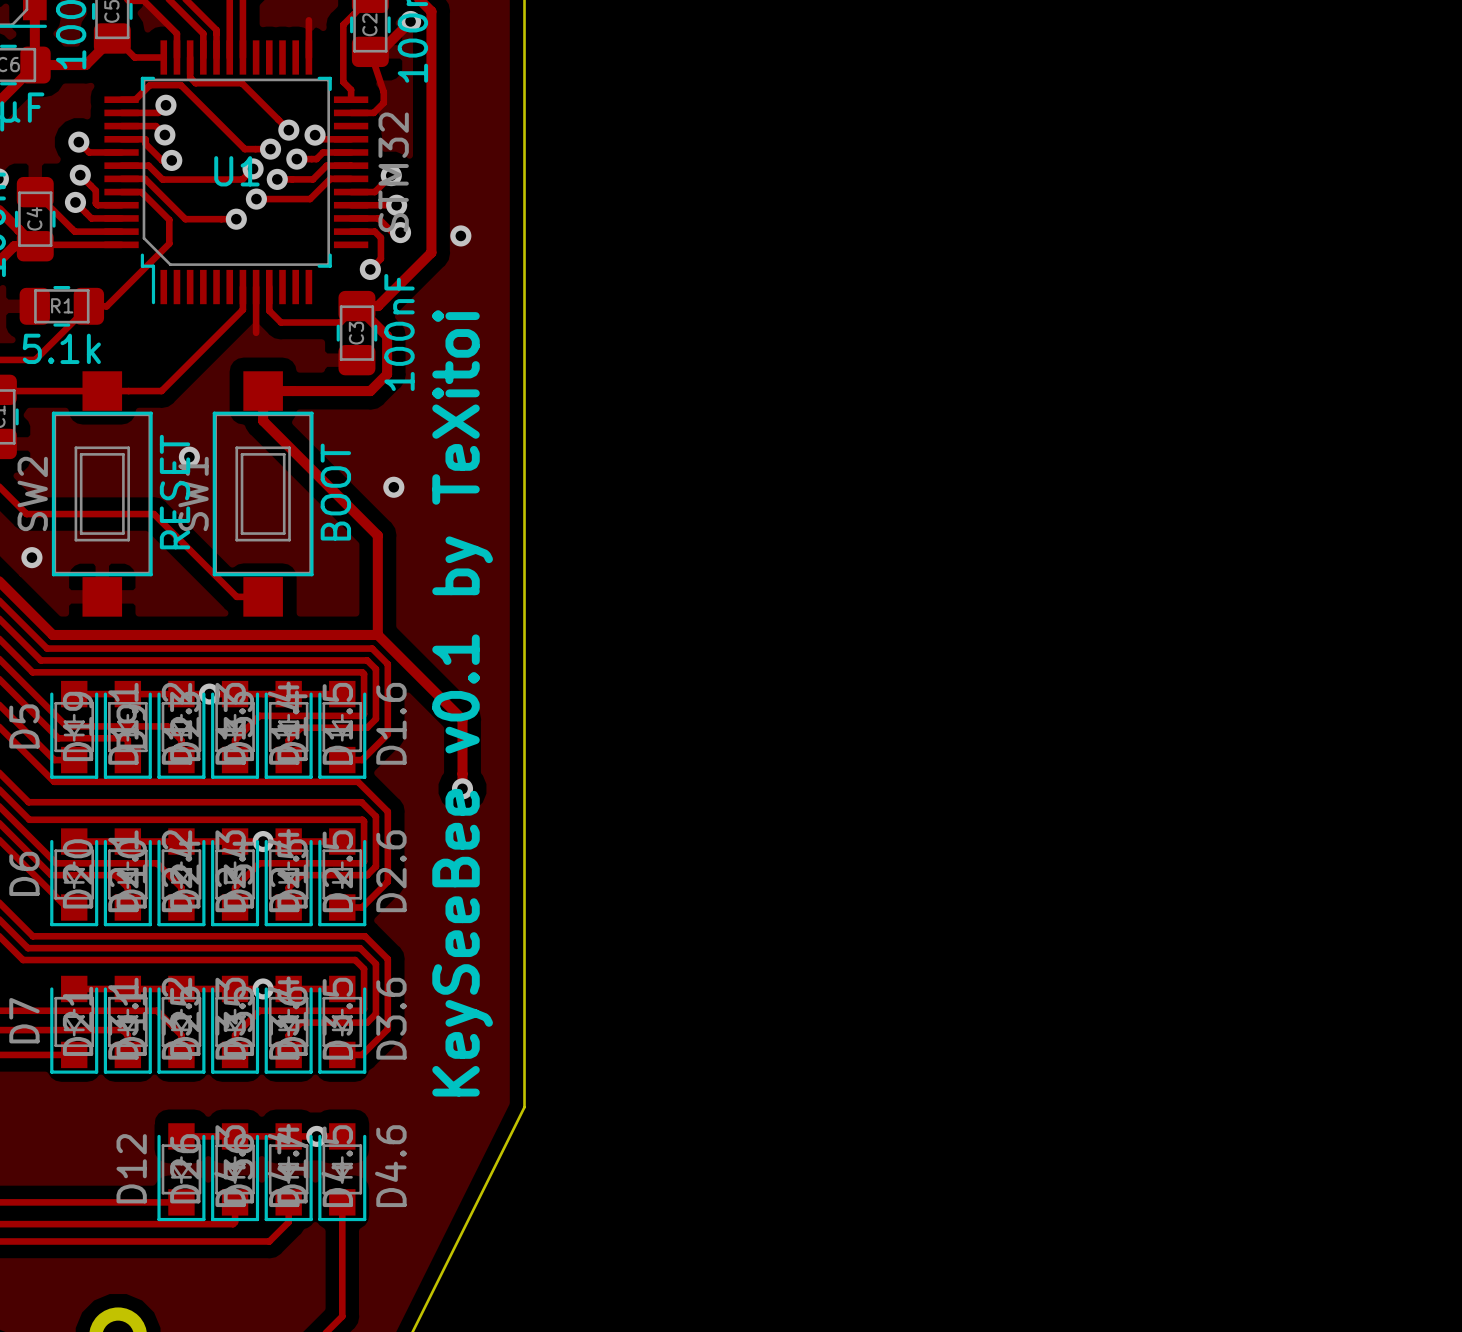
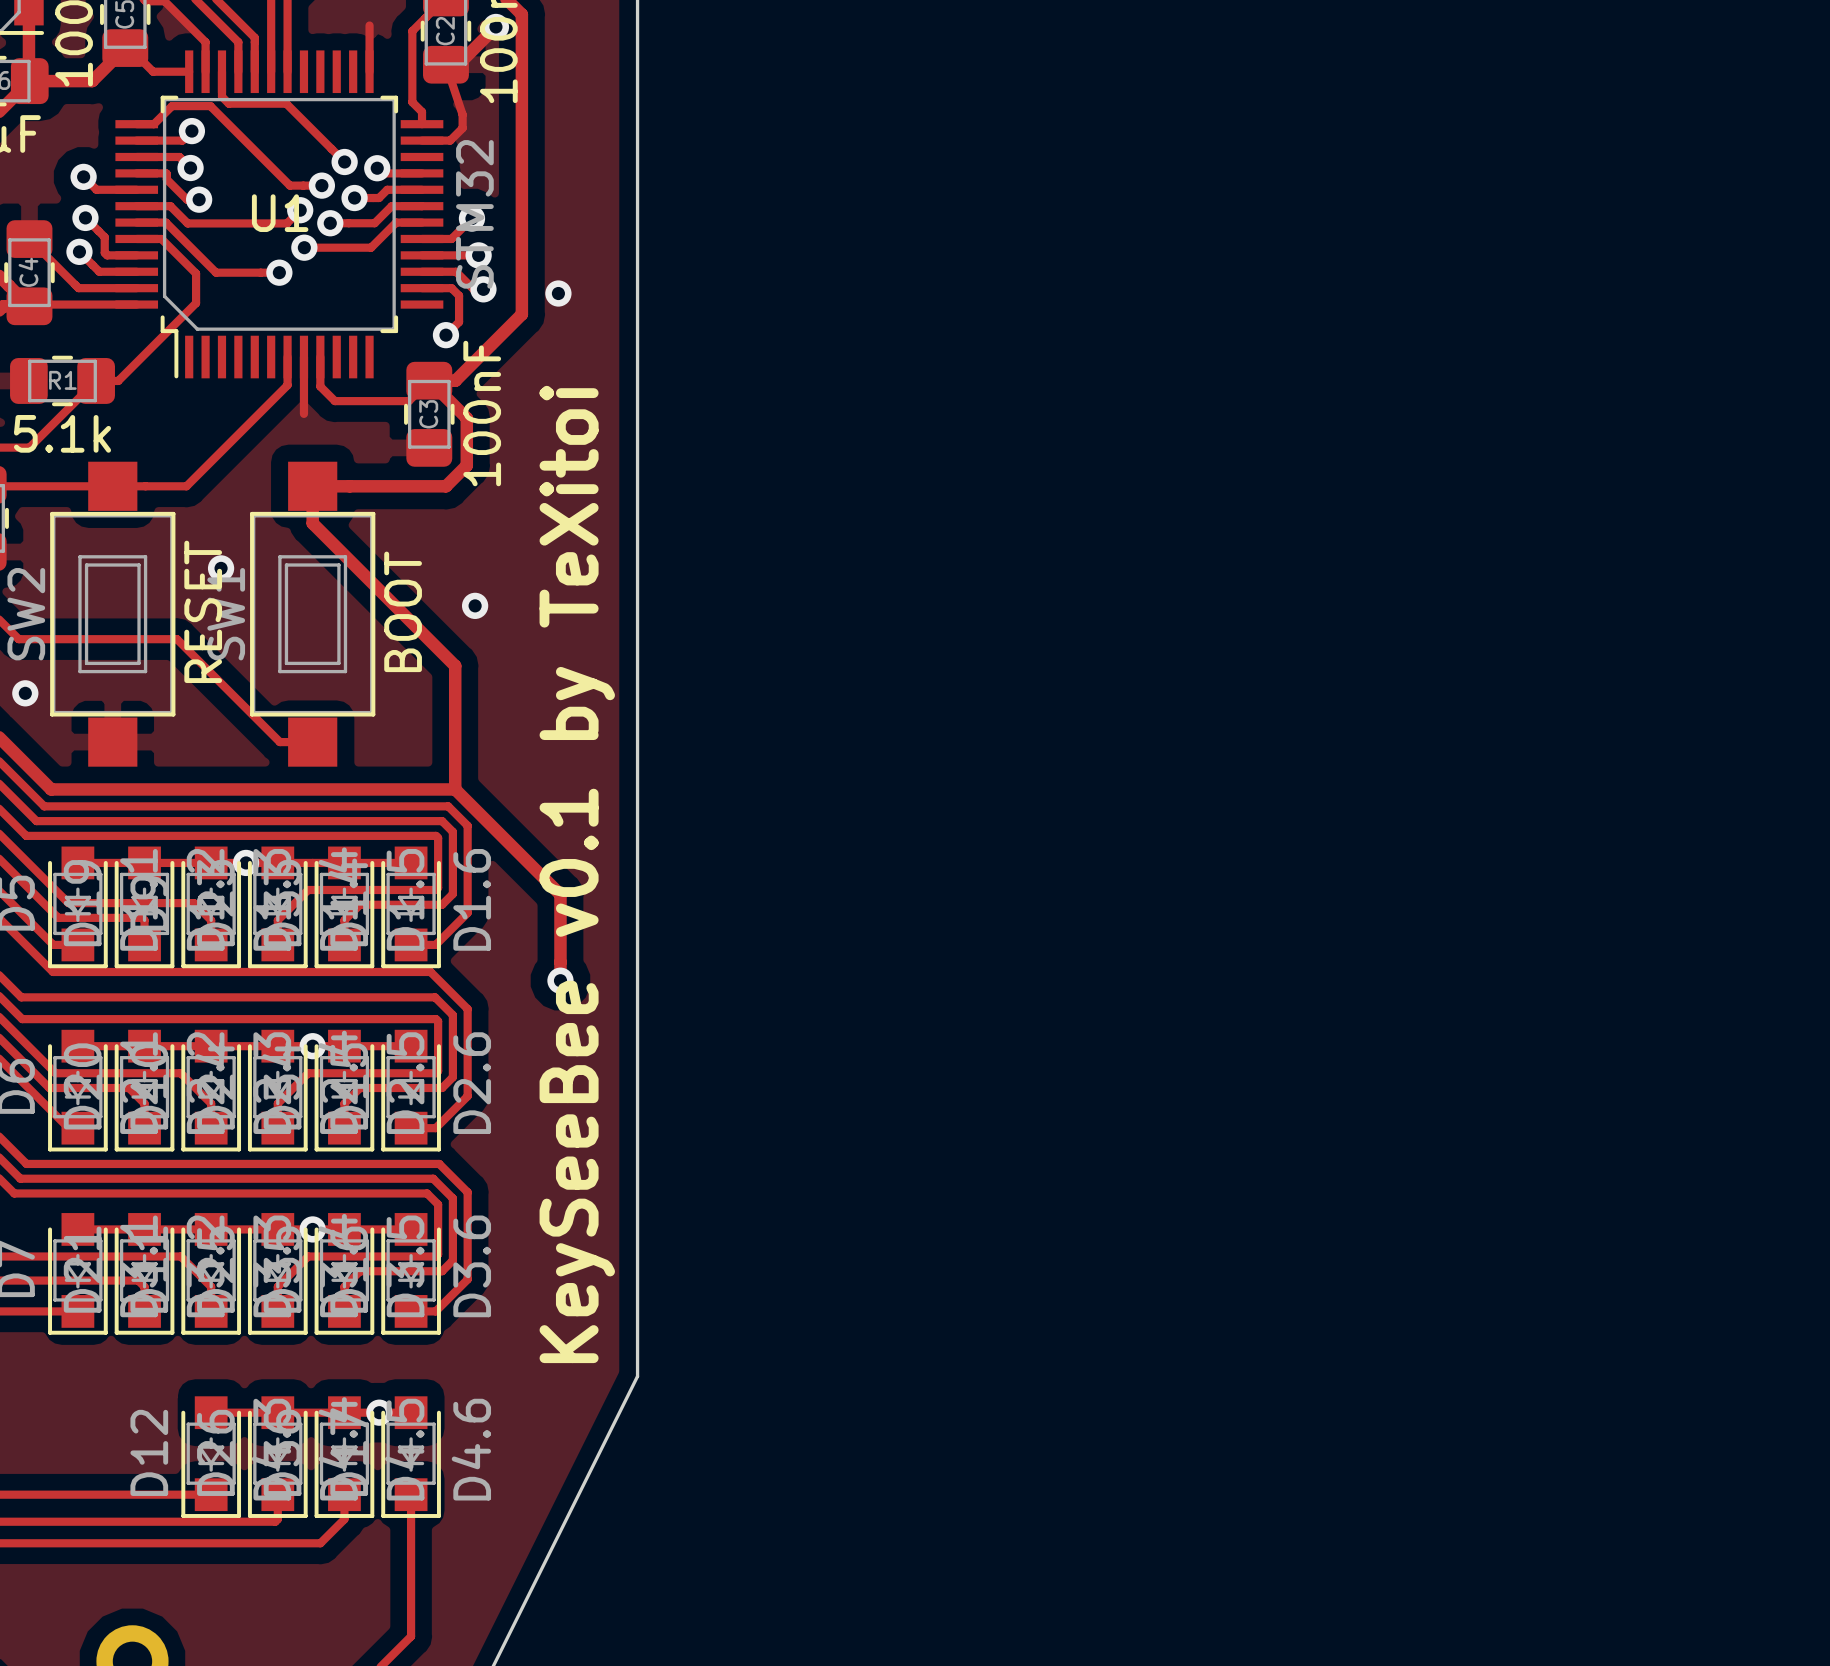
text position: KeySeeBee v0.1 by TeXitoi (462, 703) -> KeySeeBee v0.1 by TeXitoi (577, 874)

